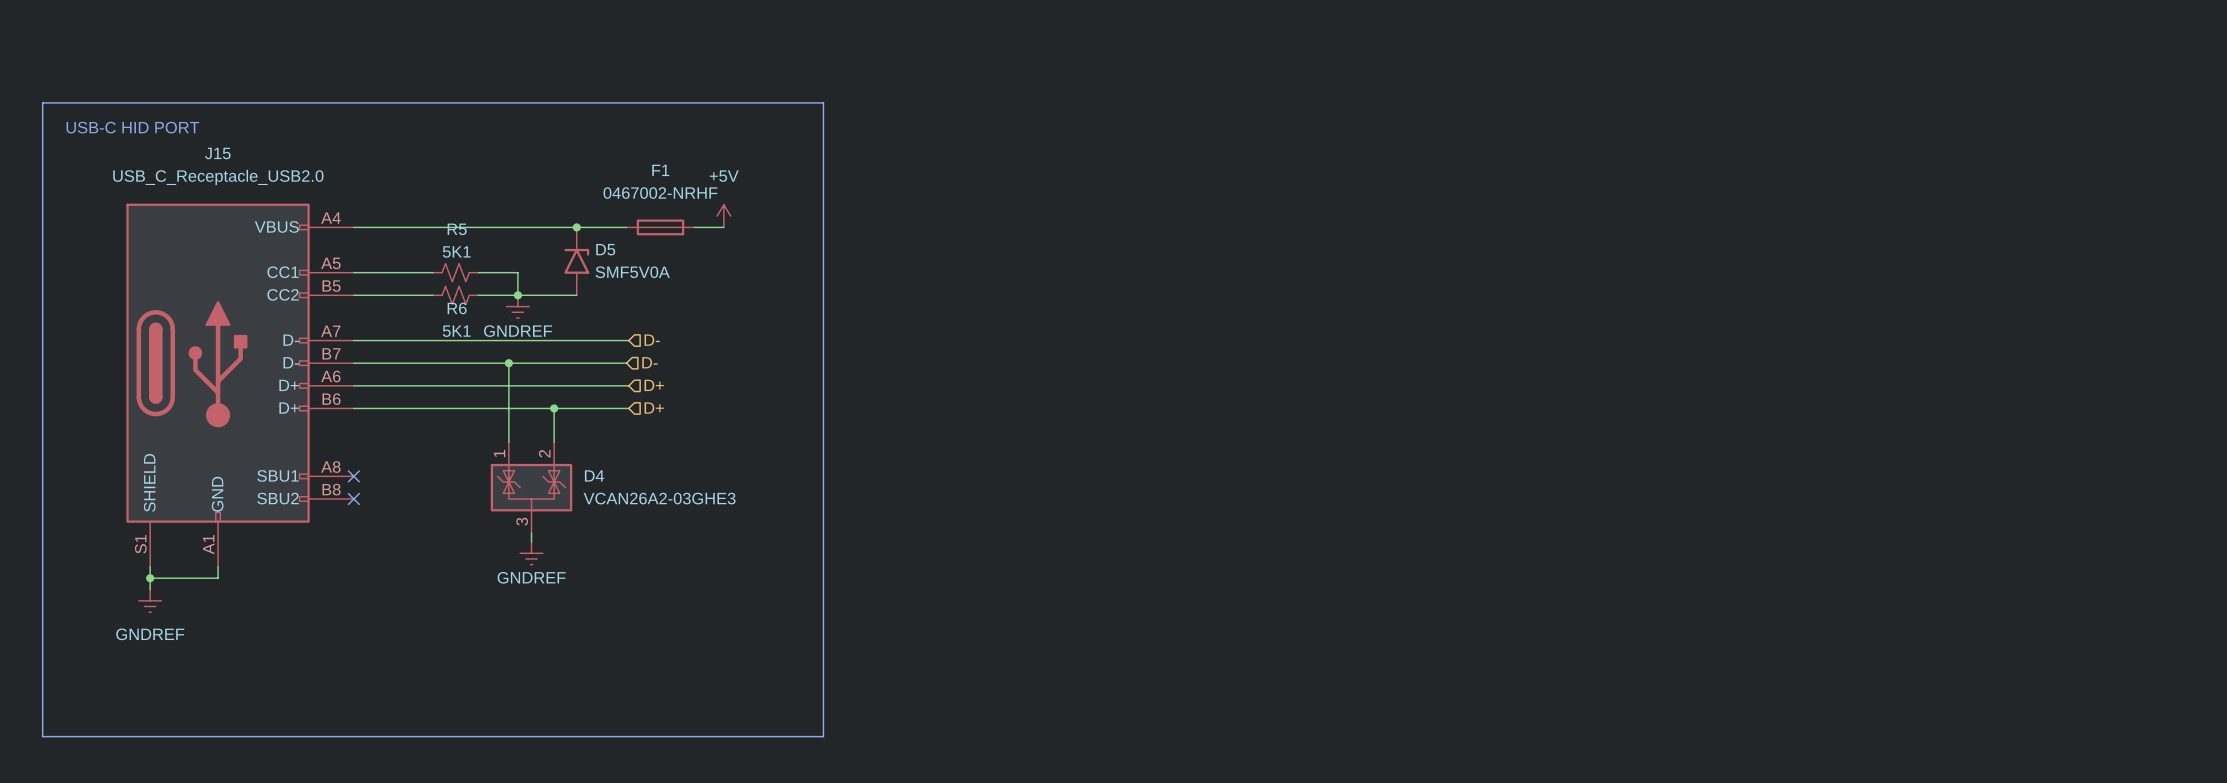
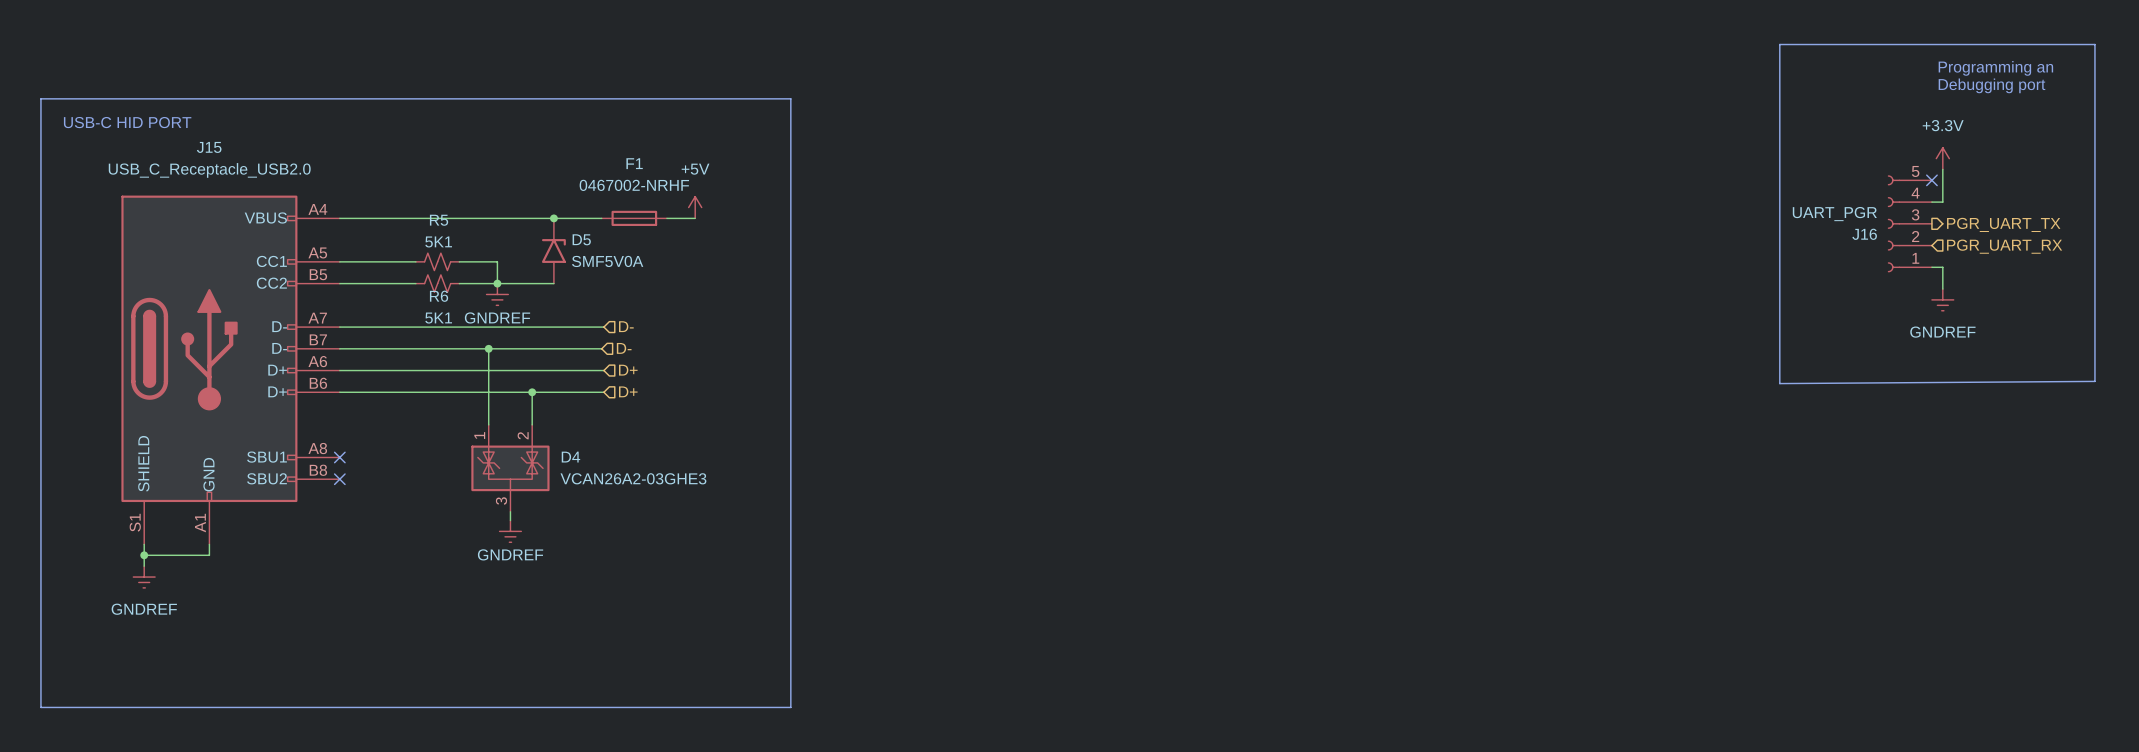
line: none -> (1779, 44) (1779, 383) (2094, 381) (2094, 44) (1779, 44)
text: none -> Programming an (1995, 68)
text: none -> Debugging port (1991, 85)
power symbol: none -> +3.3V (1942, 158)
wire: none -> (1942, 169) (1942, 202) (1931, 202)
no-connect mark: none -> (1931, 180)
J16: none -> UART_PGR (1909, 223)
hierarchical label: none -> PGR_UART_TX (2003, 224)
hierarchical label: none -> PGR_UART_RX (2004, 246)
wire: none -> (1931, 267) (1942, 267) (1942, 289)
power symbol: none -> GNDREF (1942, 299)

